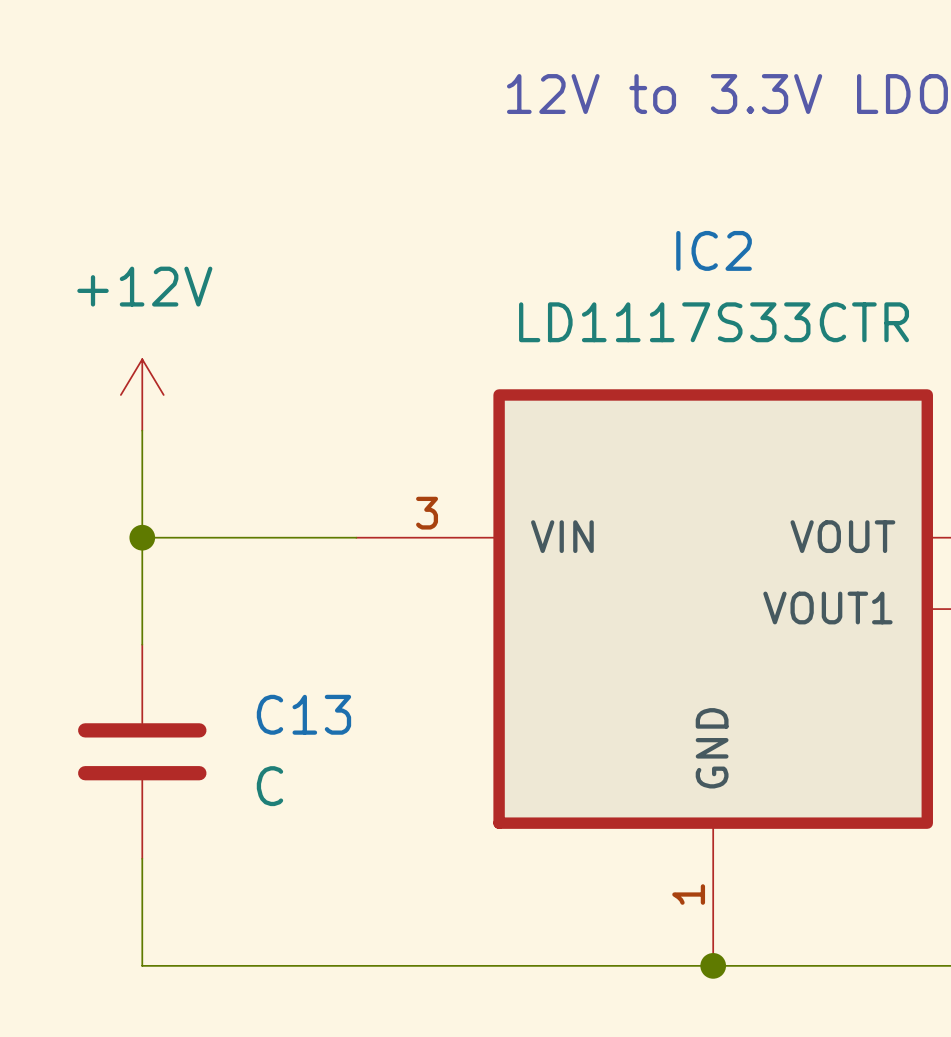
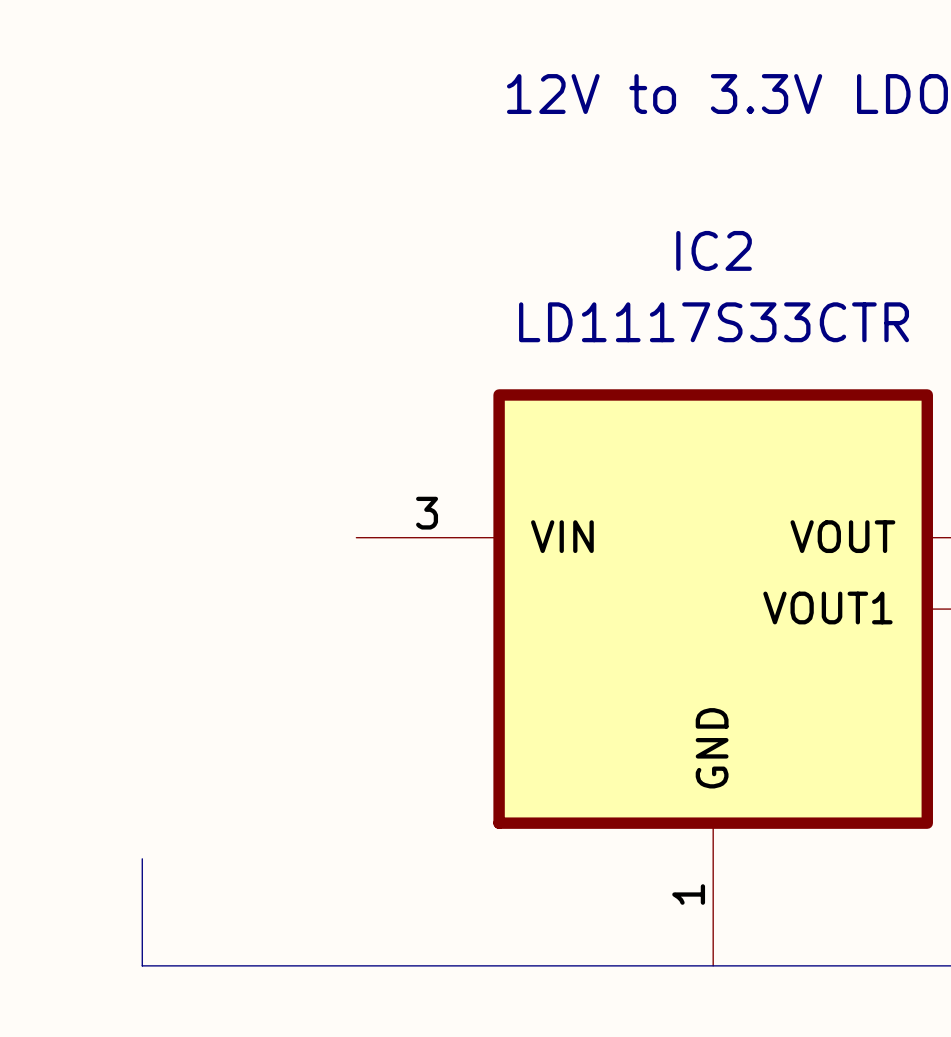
power symbol: +12V (142, 394) -> none
wire: (142, 430) (142, 644) -> none
wire: (142, 537) (356, 537) -> none
junction: (142, 537) -> none
C13: C (142, 751) -> none
junction: (713, 965) -> none

